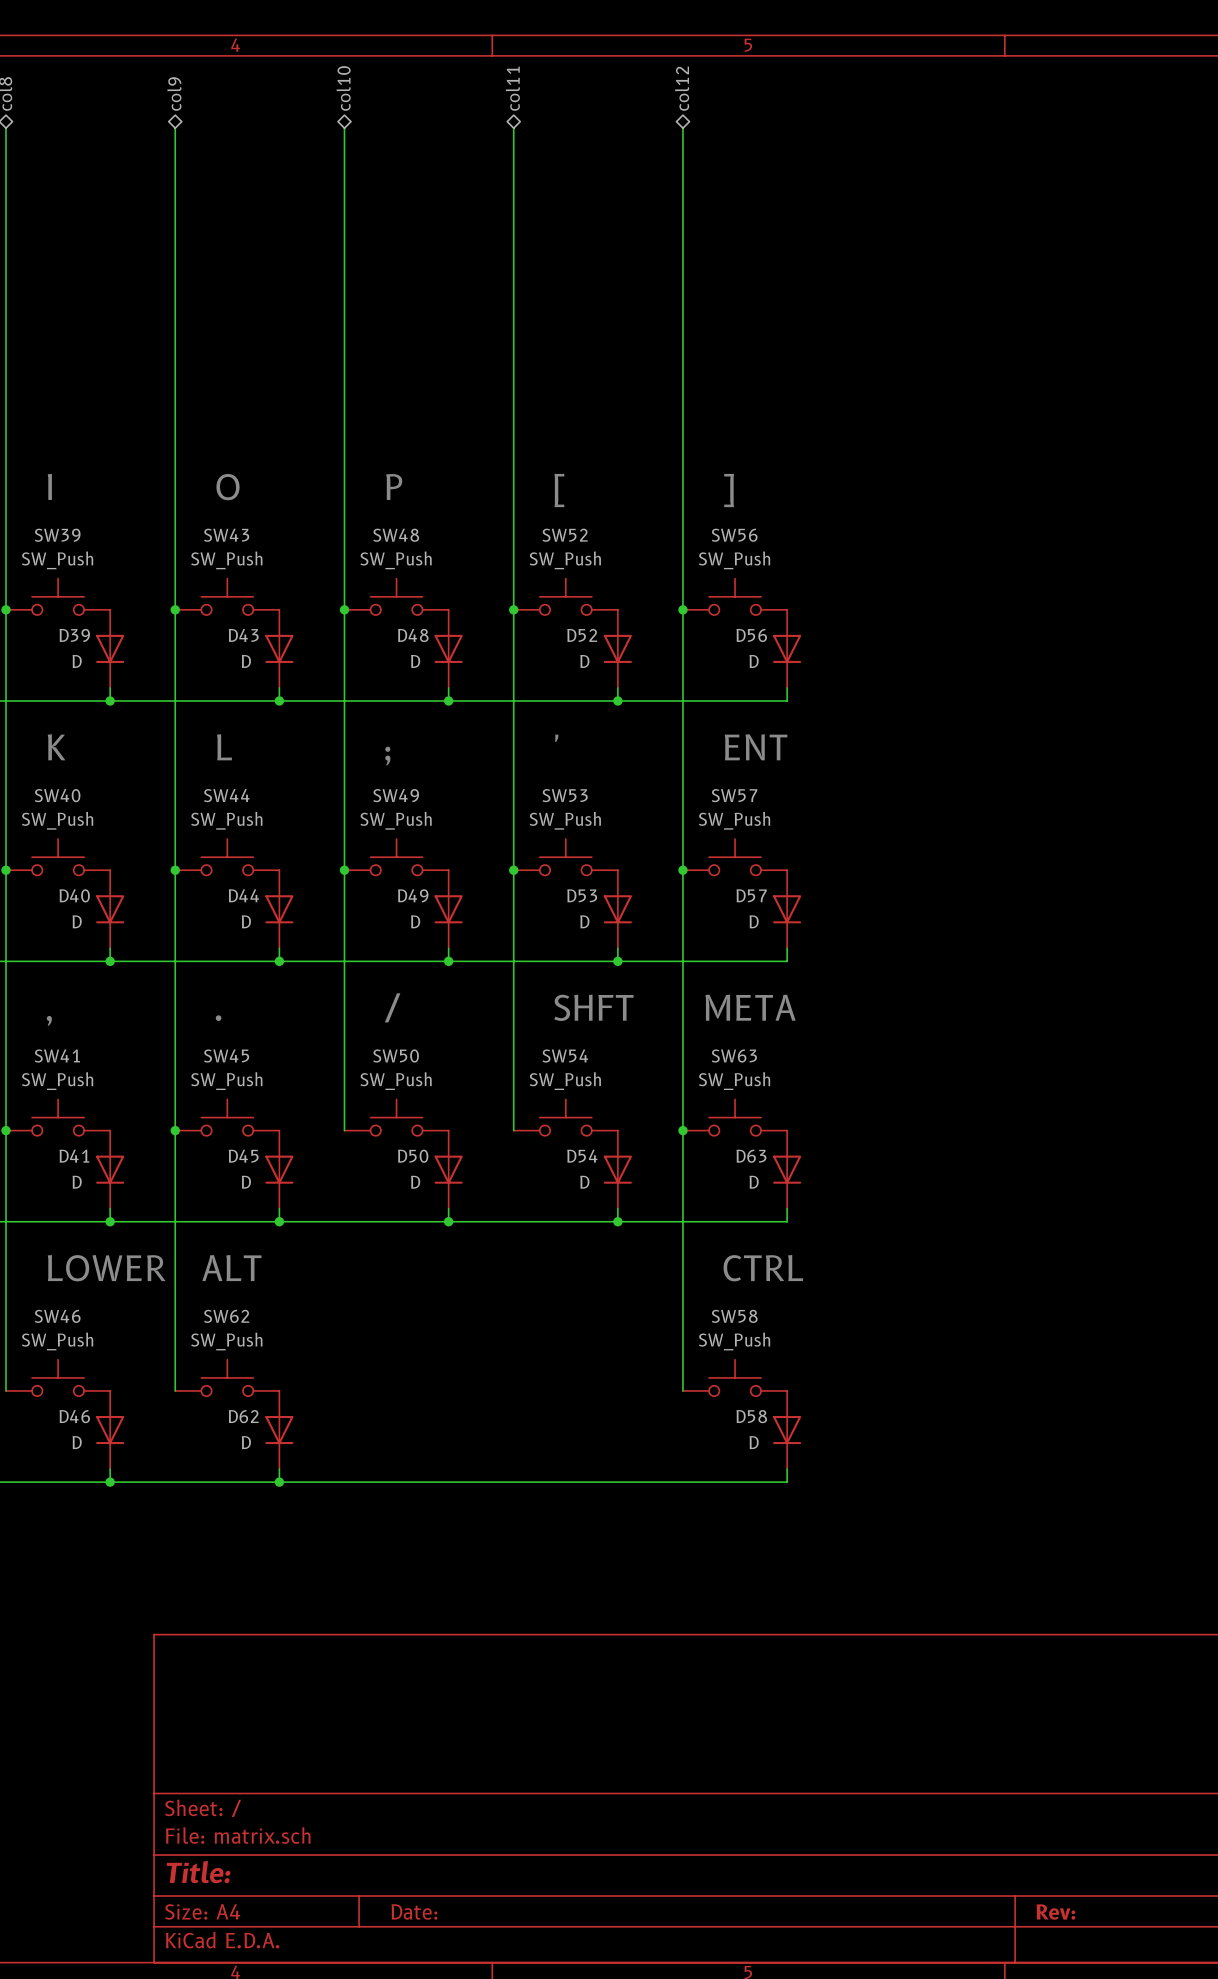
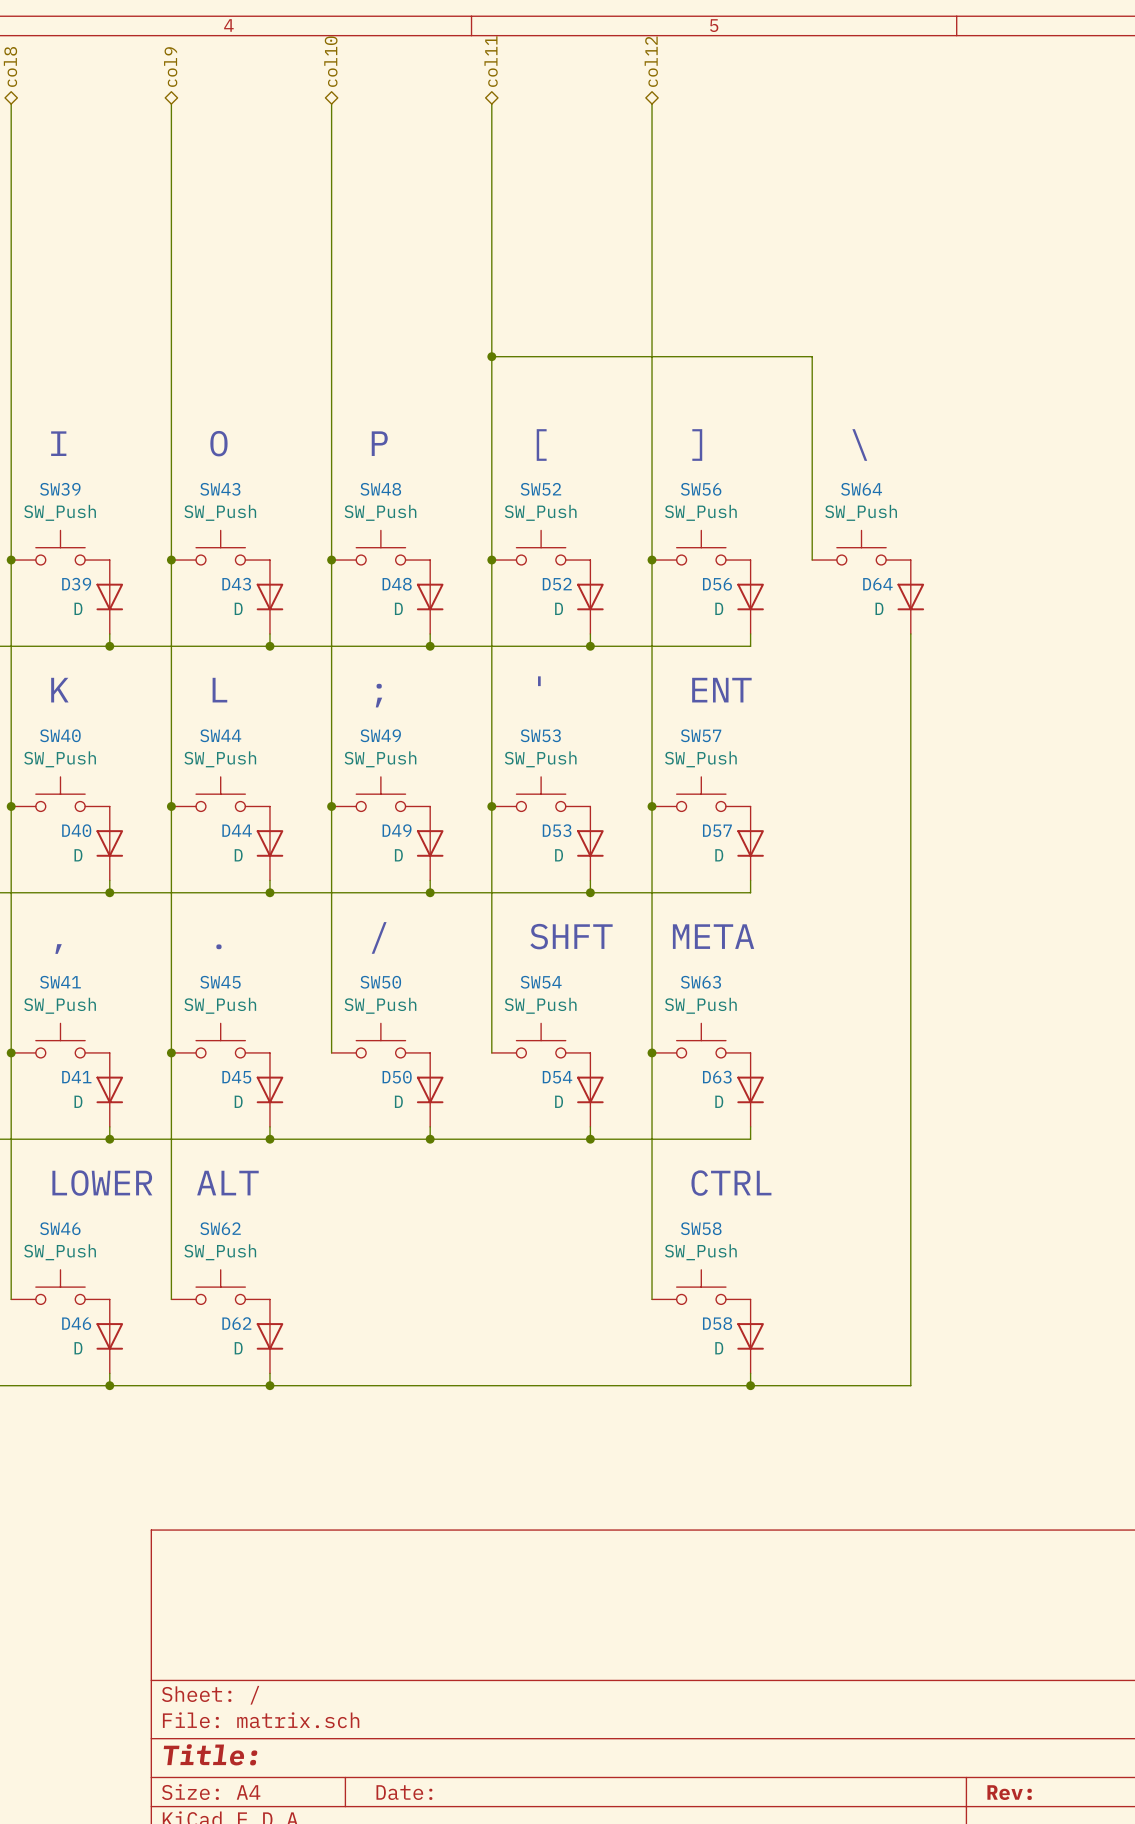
wire: none -> (491, 356) (812, 356) (812, 560)
junction: none -> (491, 356)
text: none -> \ (859, 445)
SW64: none -> SW_Push (861, 547)
D64: none -> D (910, 596)
wire: none -> (910, 633) (910, 1385) (750, 1385)
junction: none -> (750, 1385)

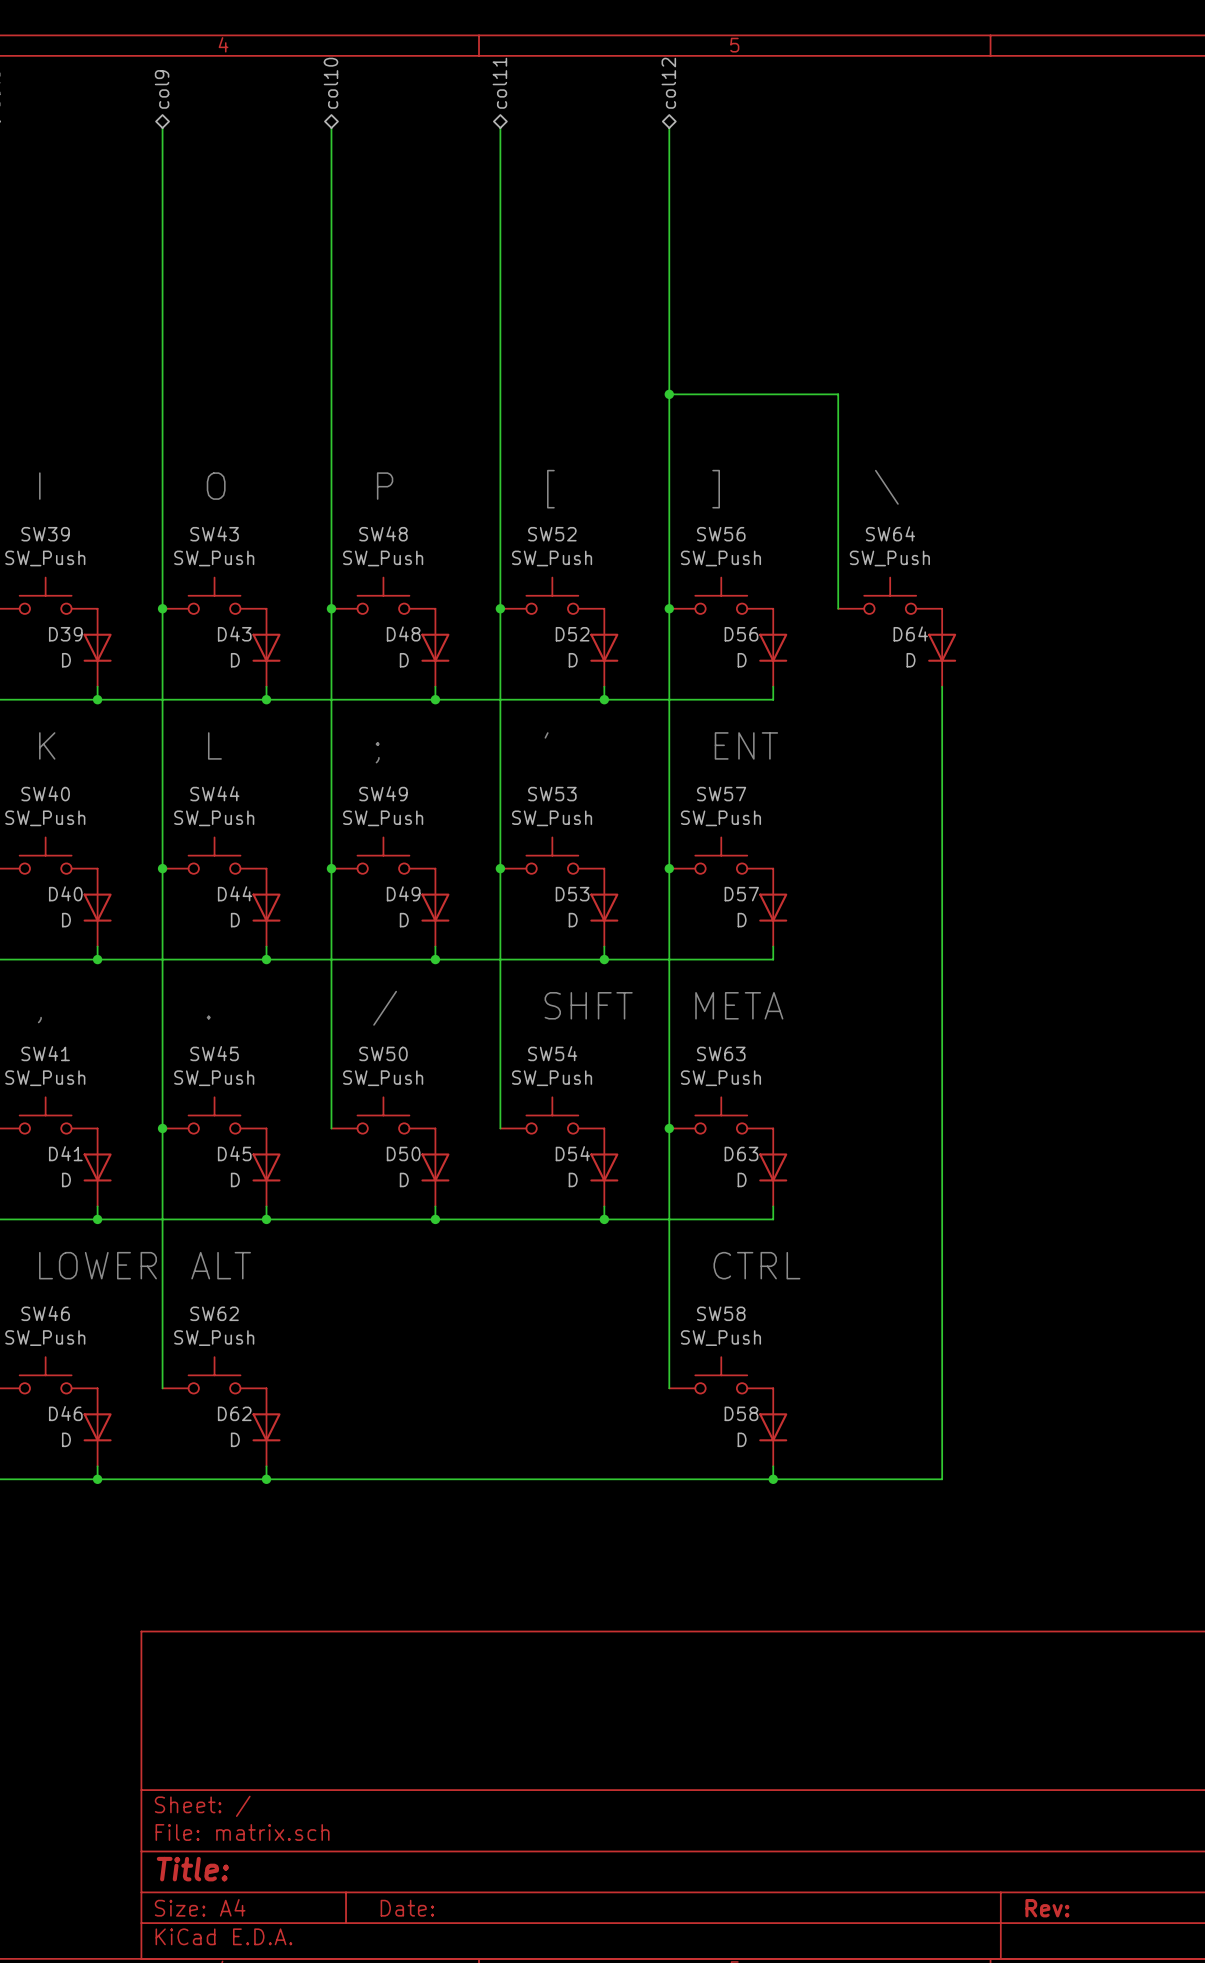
wire: (491, 356) (652, 356) -> none
junction: (491, 356) -> none
junction: none -> (669, 394)

